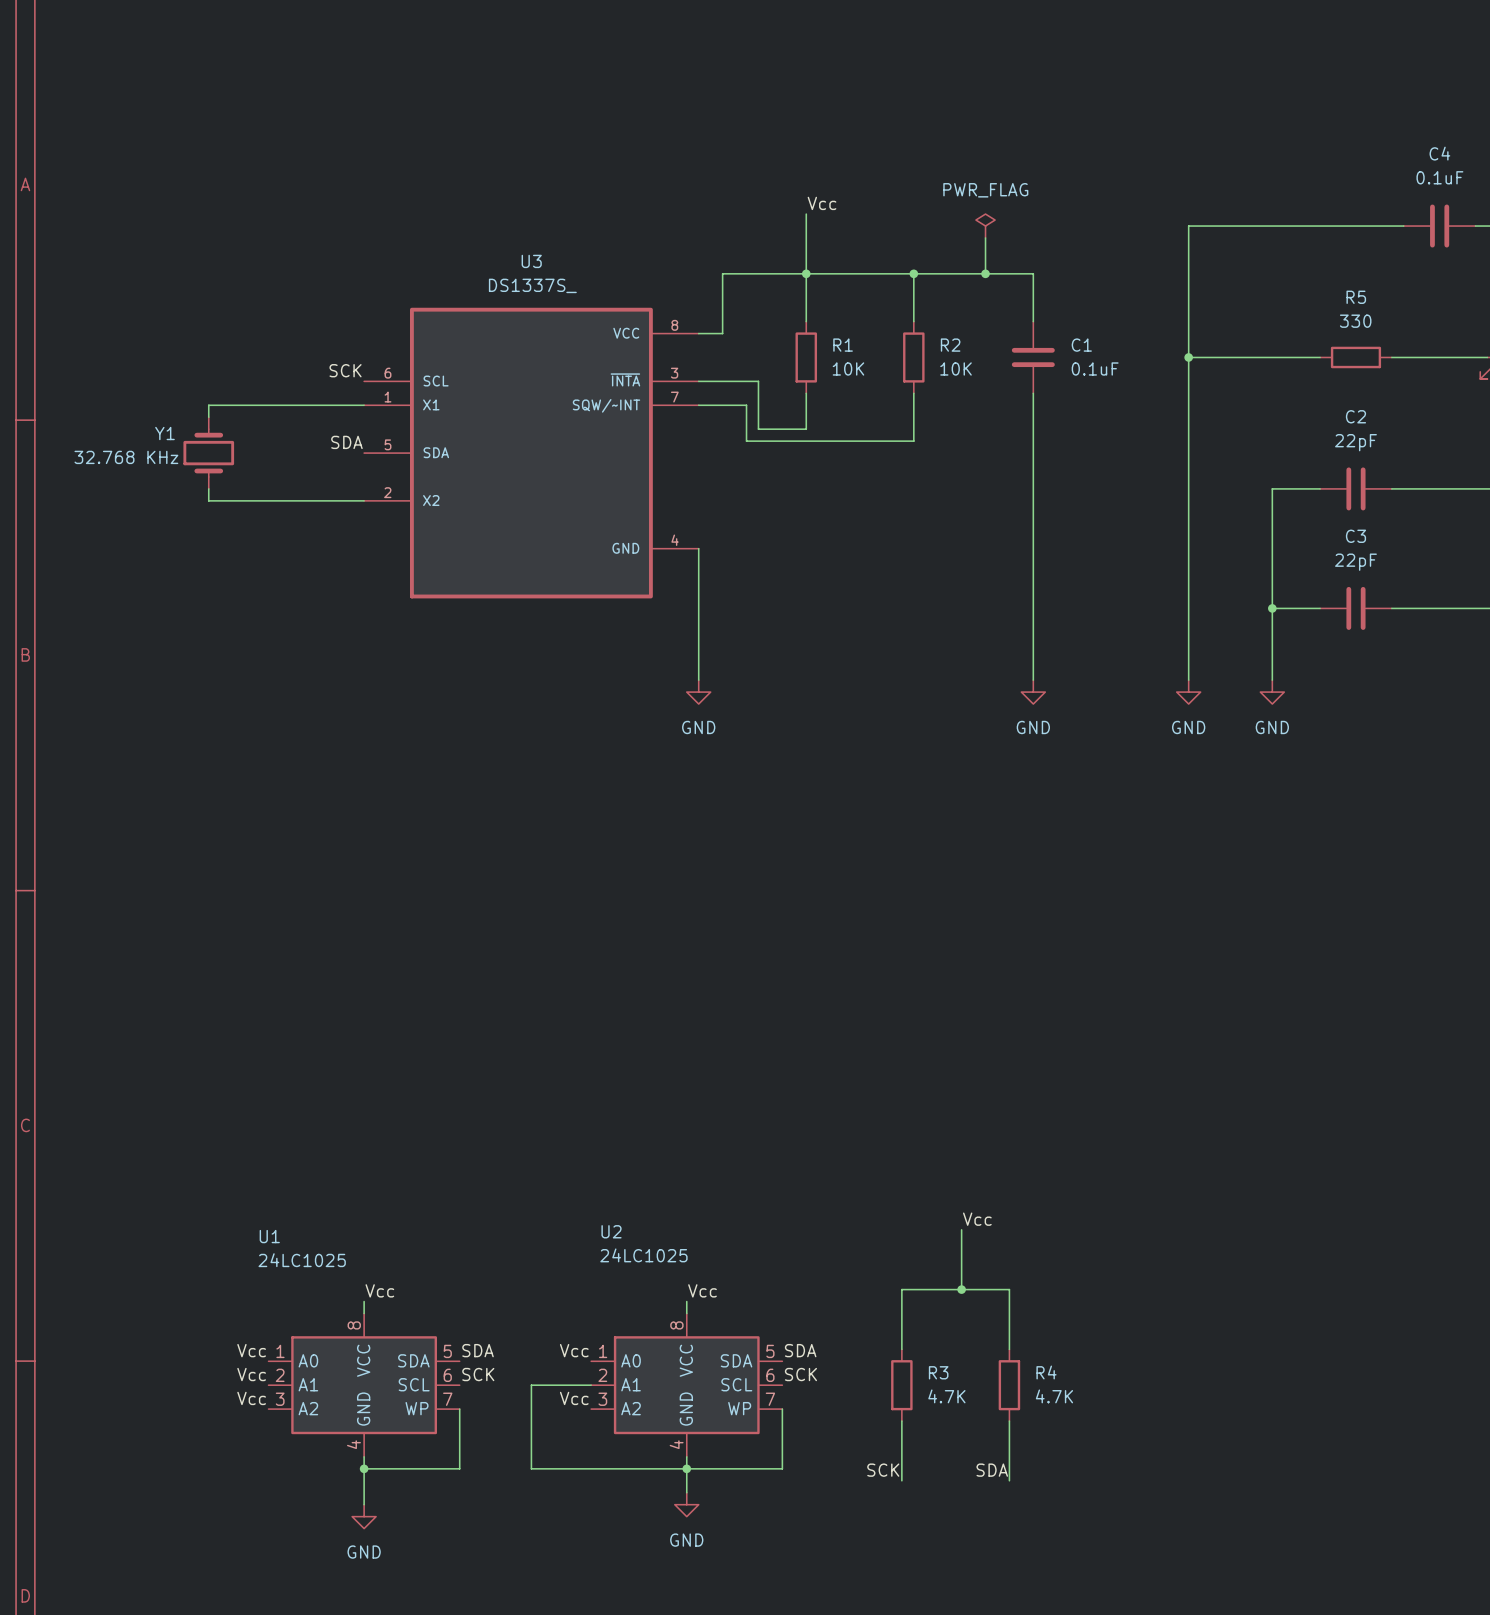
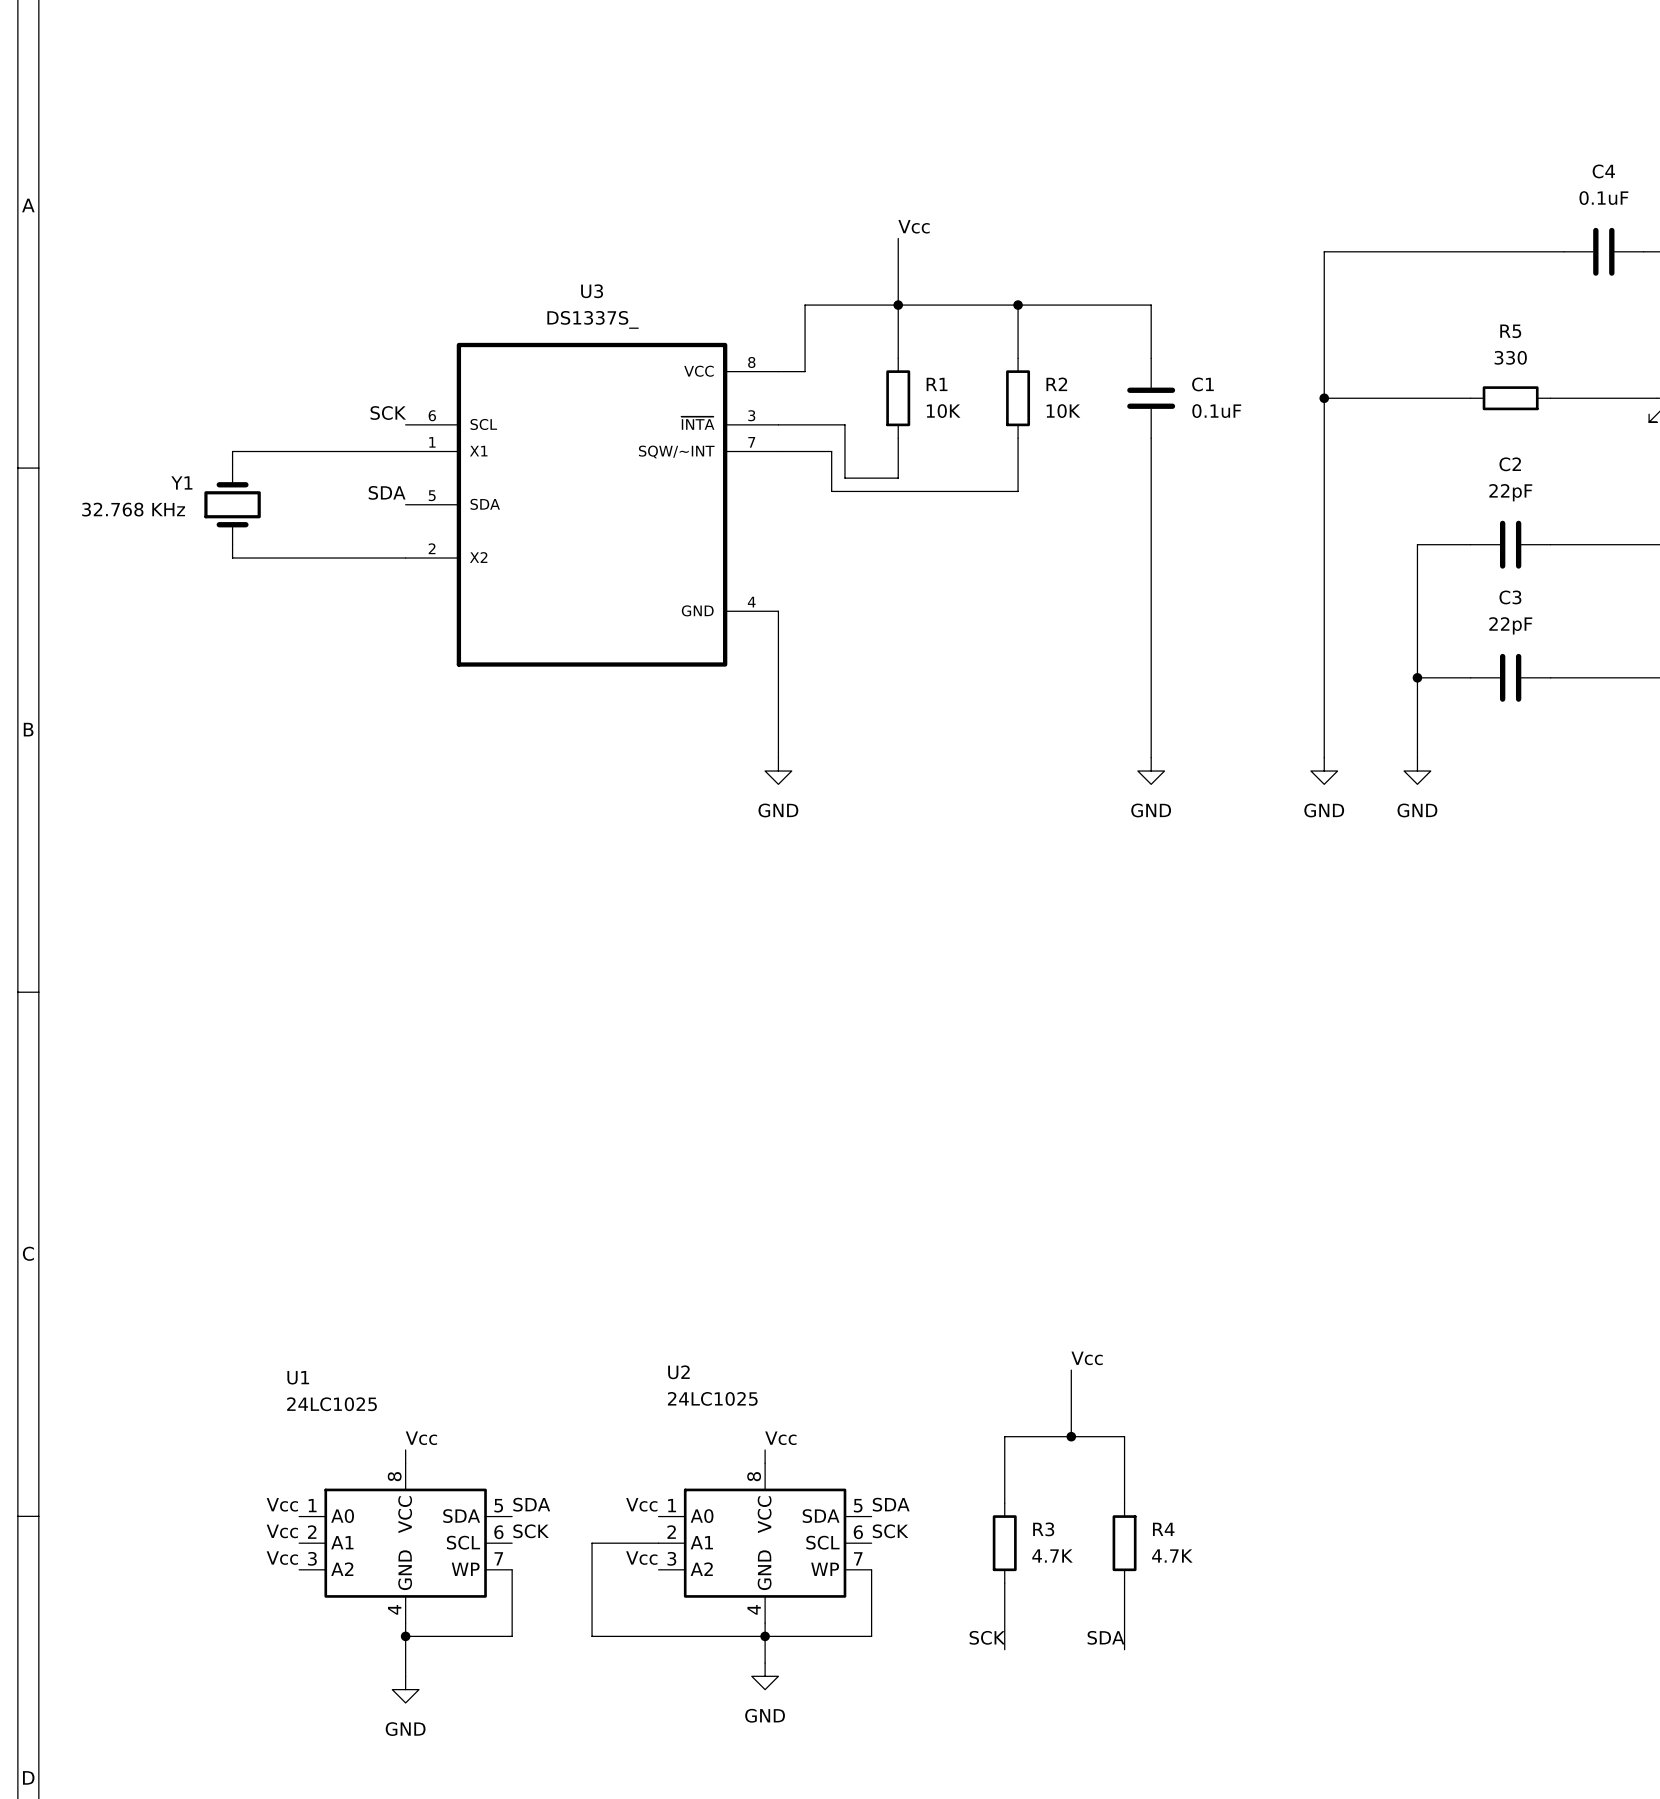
power symbol: PWR_FLAG (985, 226) -> none
wire: (985, 237) (985, 273) -> none
junction: (985, 273) -> none

